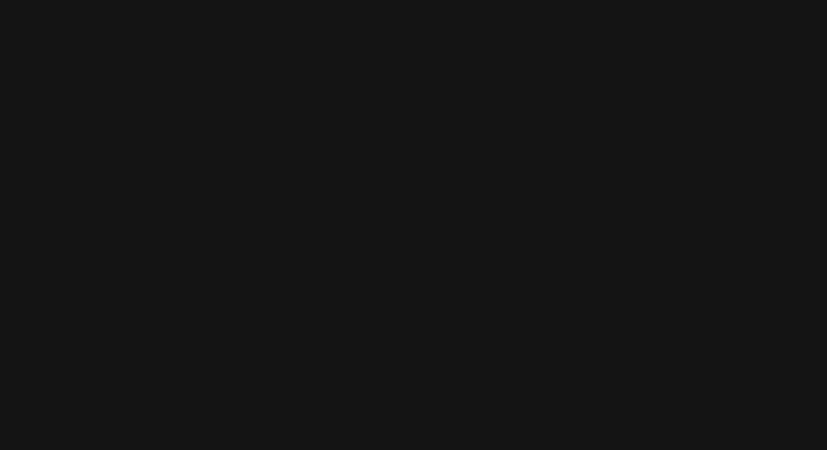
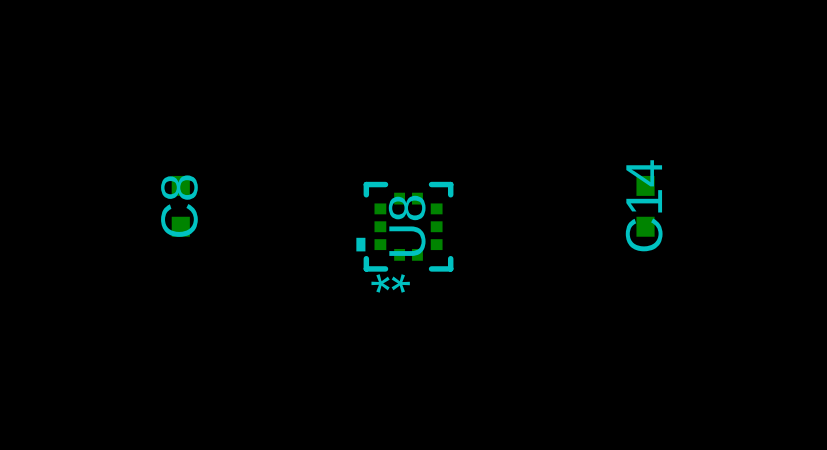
C8: none -> (180, 206)
C14: none -> (645, 206)
U8: none -> (404, 226)

